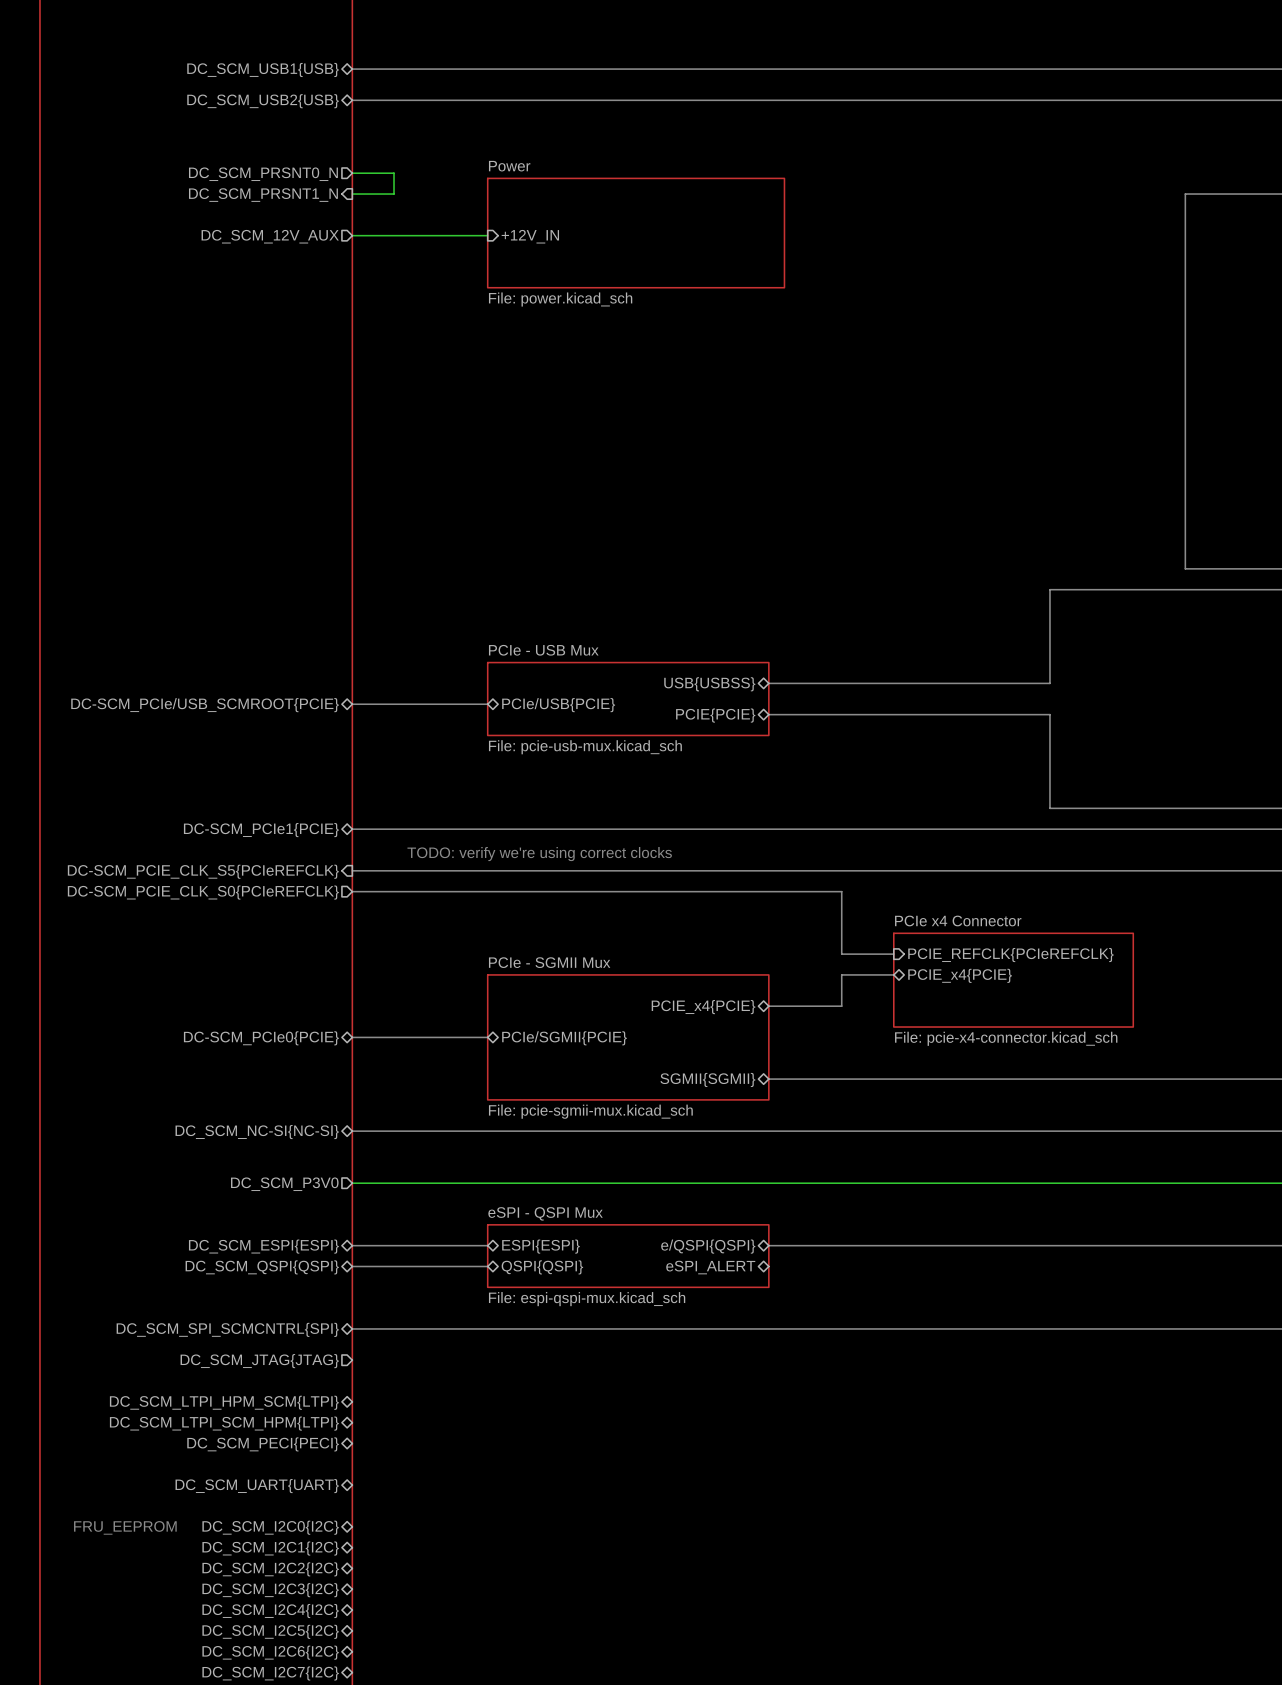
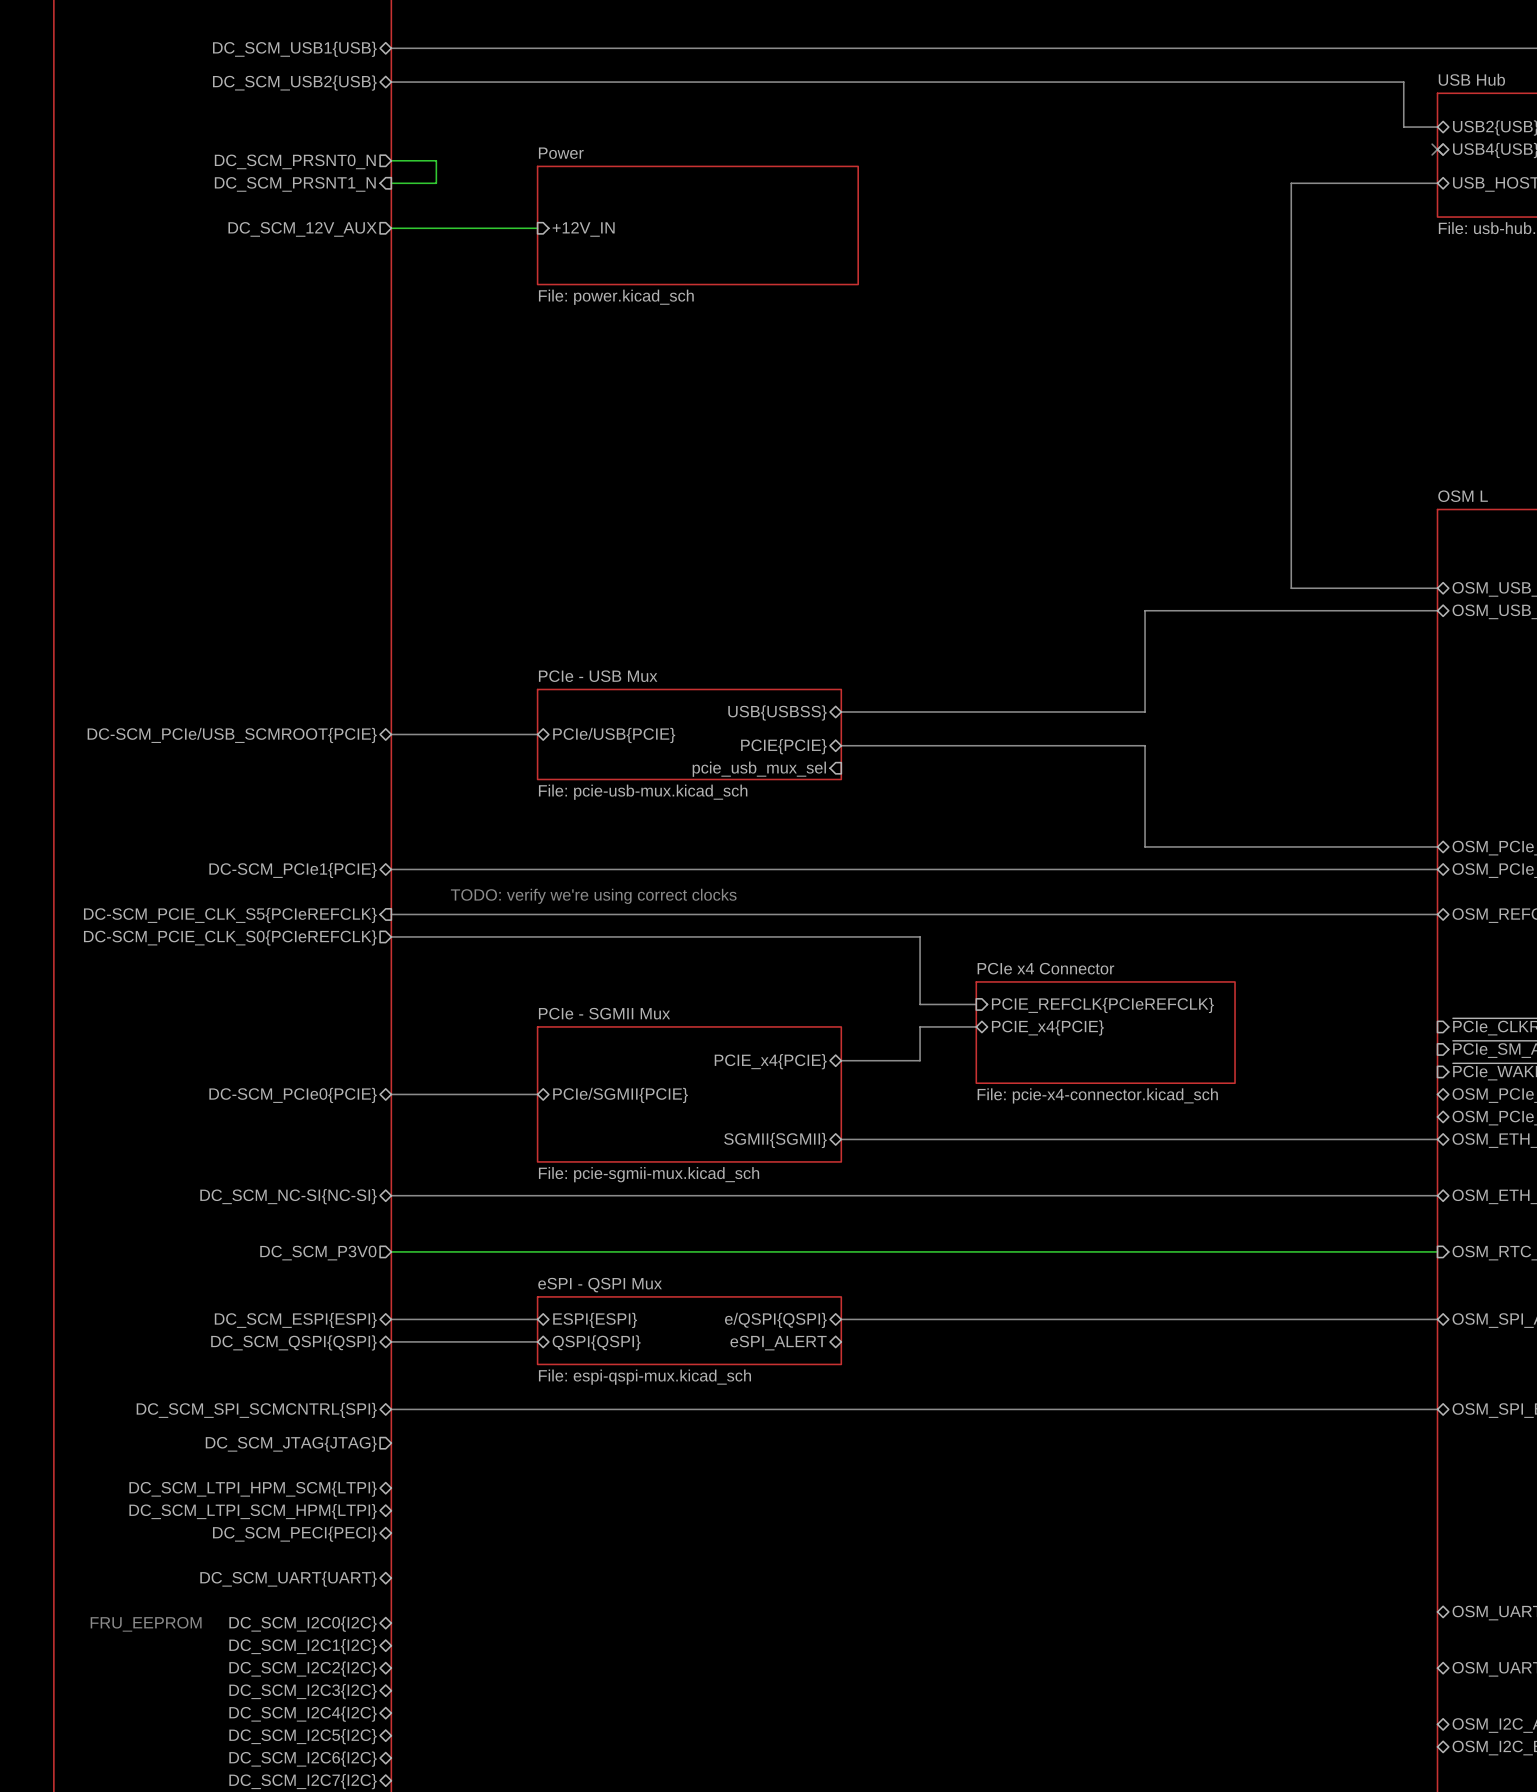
sheet PCIe - USB Mux shape: [487, 661, 770, 737] -> [536, 688, 842, 781]
sheet pin: none -> pcie_usb_mux_sel (759, 769)

